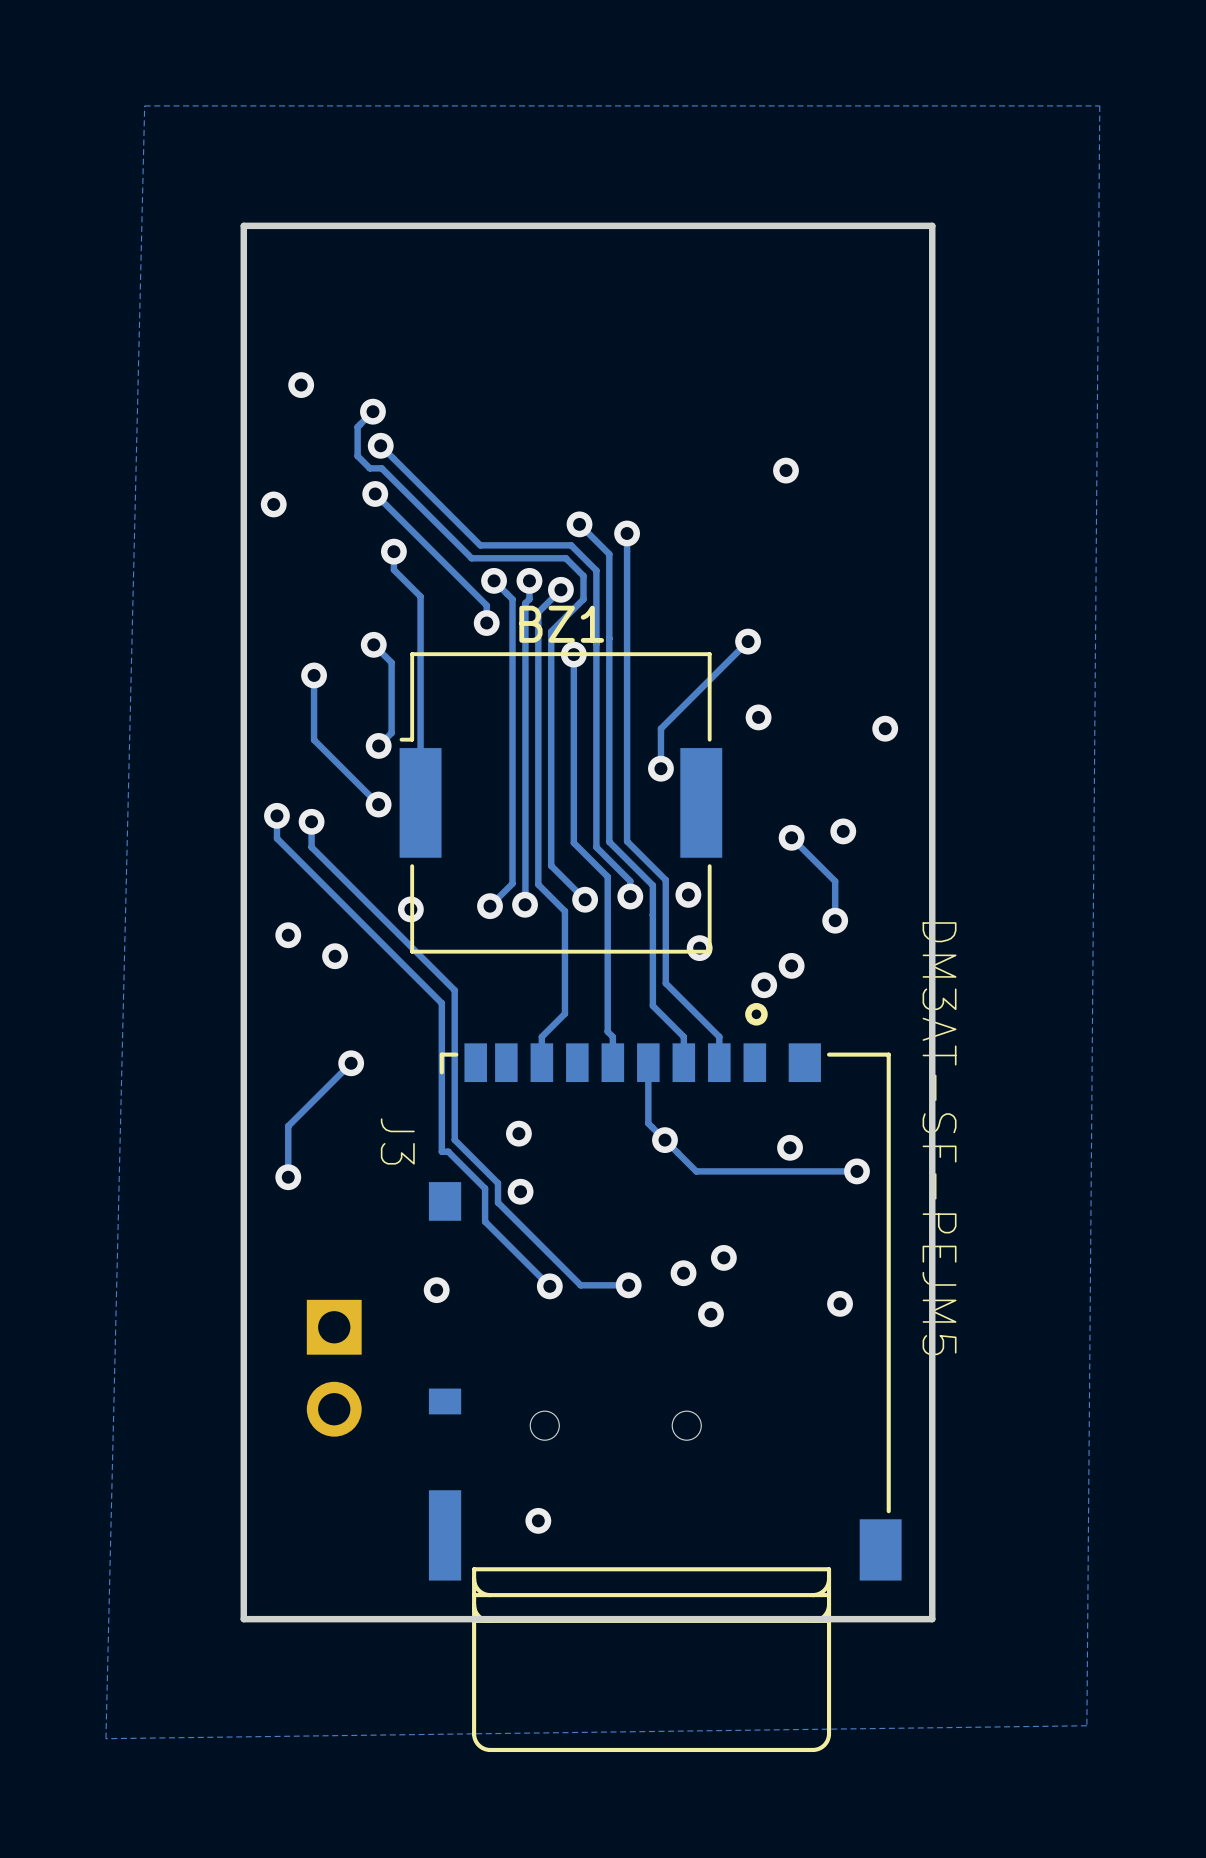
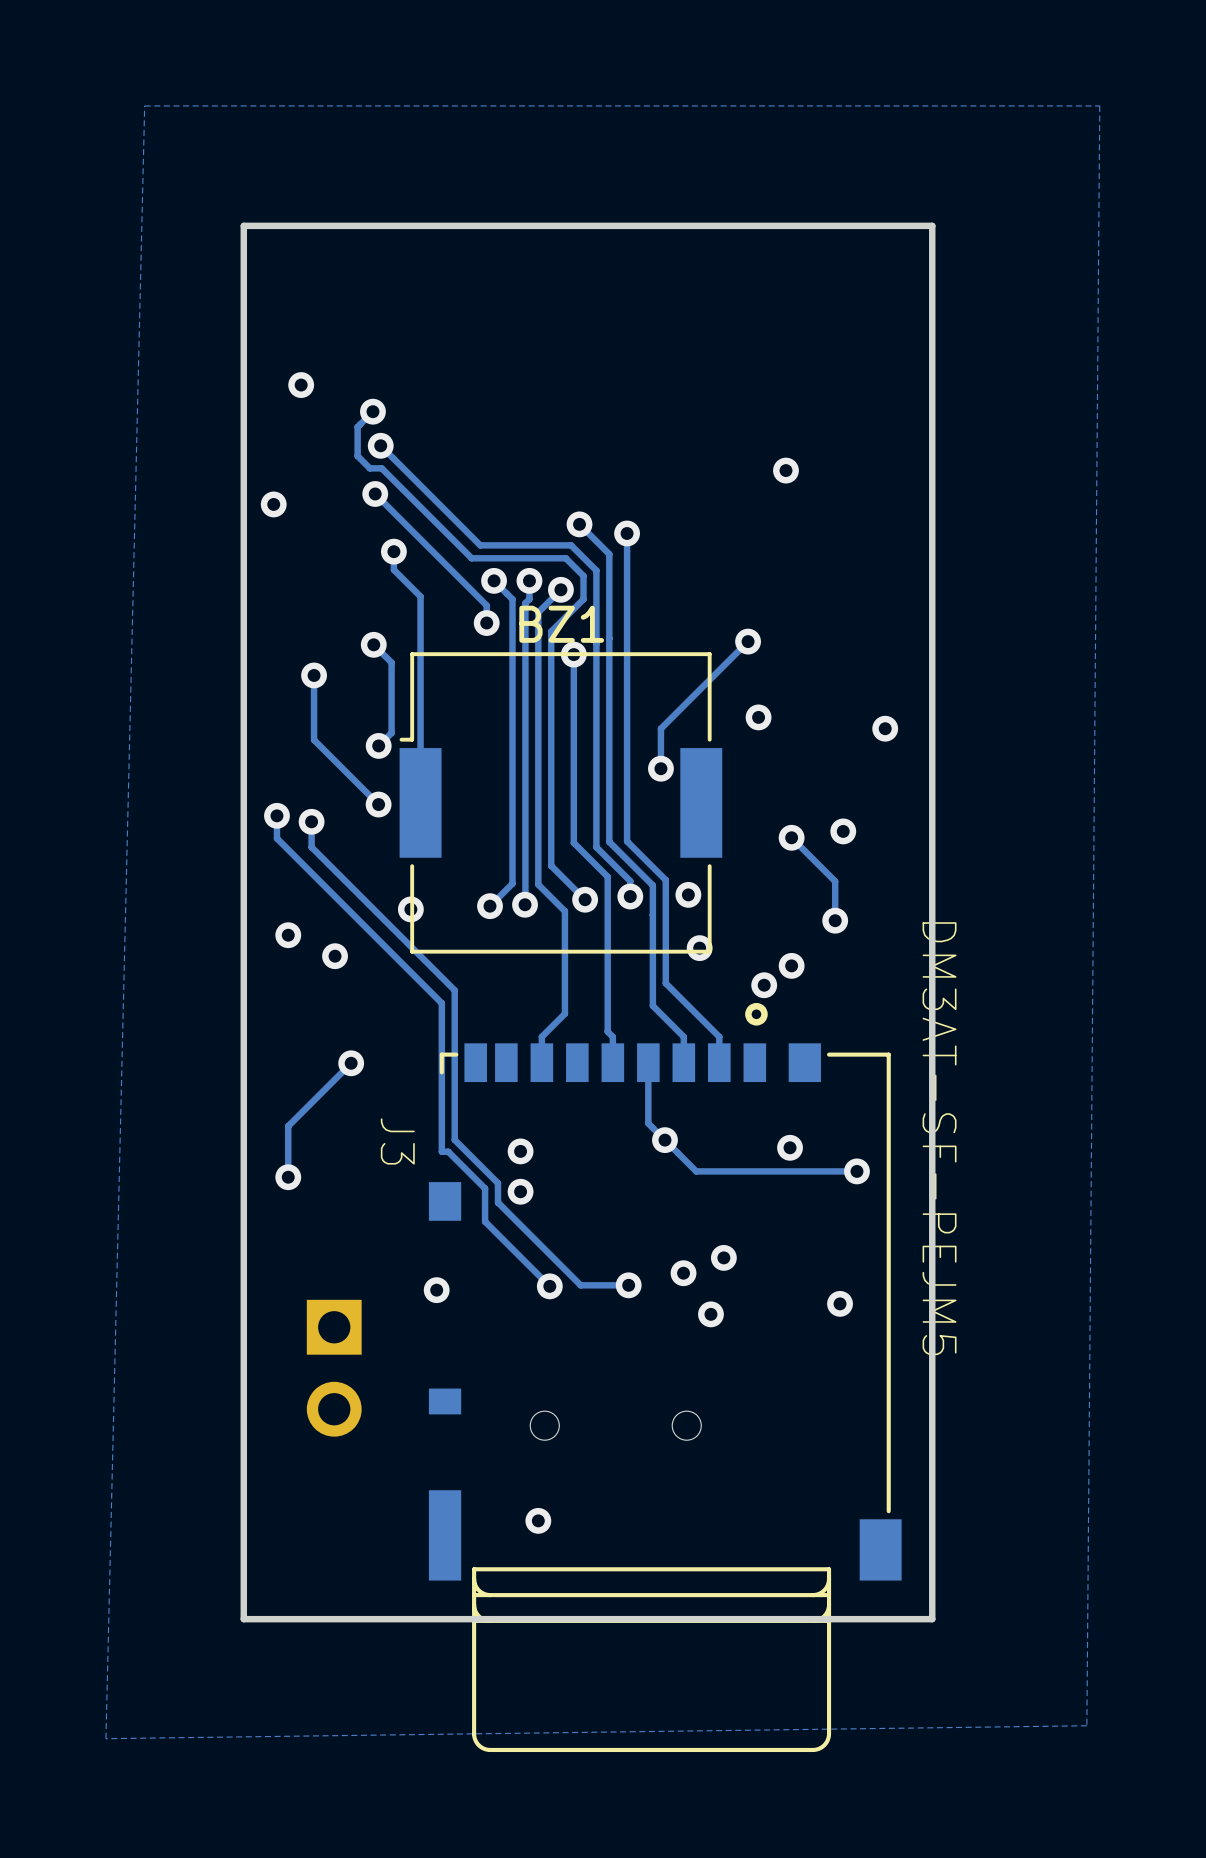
via position: (518, 1133) -> (520, 1151)

